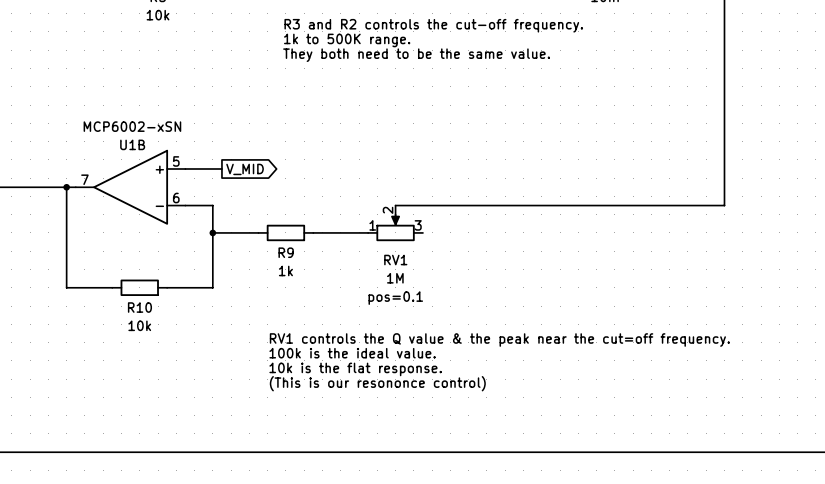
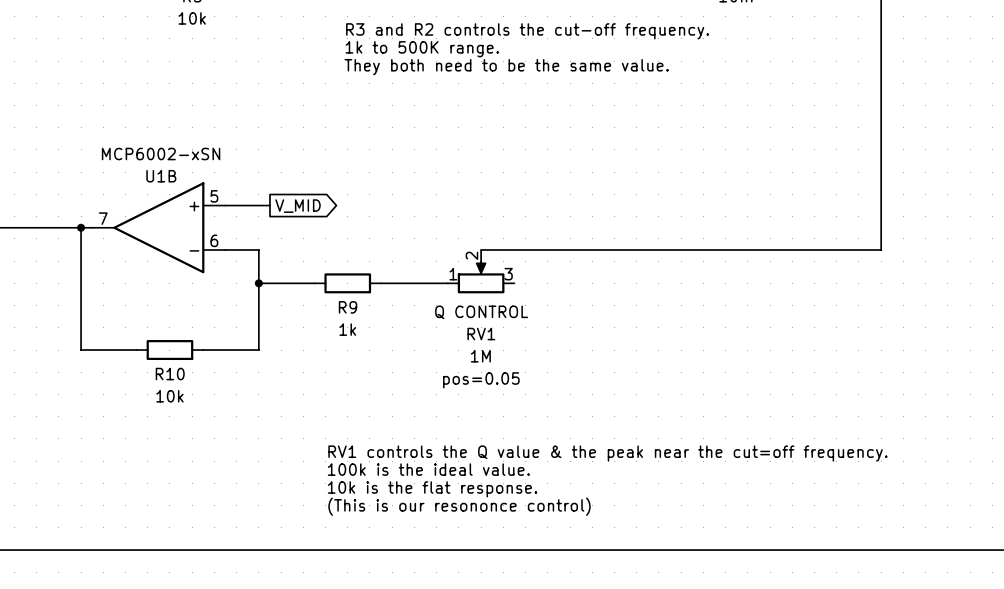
RV1 text: none -> Q CONTROL (481, 312)
RV1 name position: RV1 (395, 260) -> RV1 (481, 334)
RV1 value position: 1M (395, 278) -> 1M (480, 356)
RV1 text: pos=0.1 (395, 298) -> pos=0.05 (481, 380)
text position: RV1 controls the Q value & the peak near the cut=off frequency. (499, 340) -> RV1 controls the Q value & the peak near the cut=off frequency. (607, 453)
text position: 100k is the ideal value. (352, 353) -> 100k is the ideal value. (428, 469)
text position: 10k is the flat response. (355, 369) -> 10k is the flat response. (432, 489)
text position: (This is our resononce control) (377, 383) -> (This is our resononce control) (459, 506)

